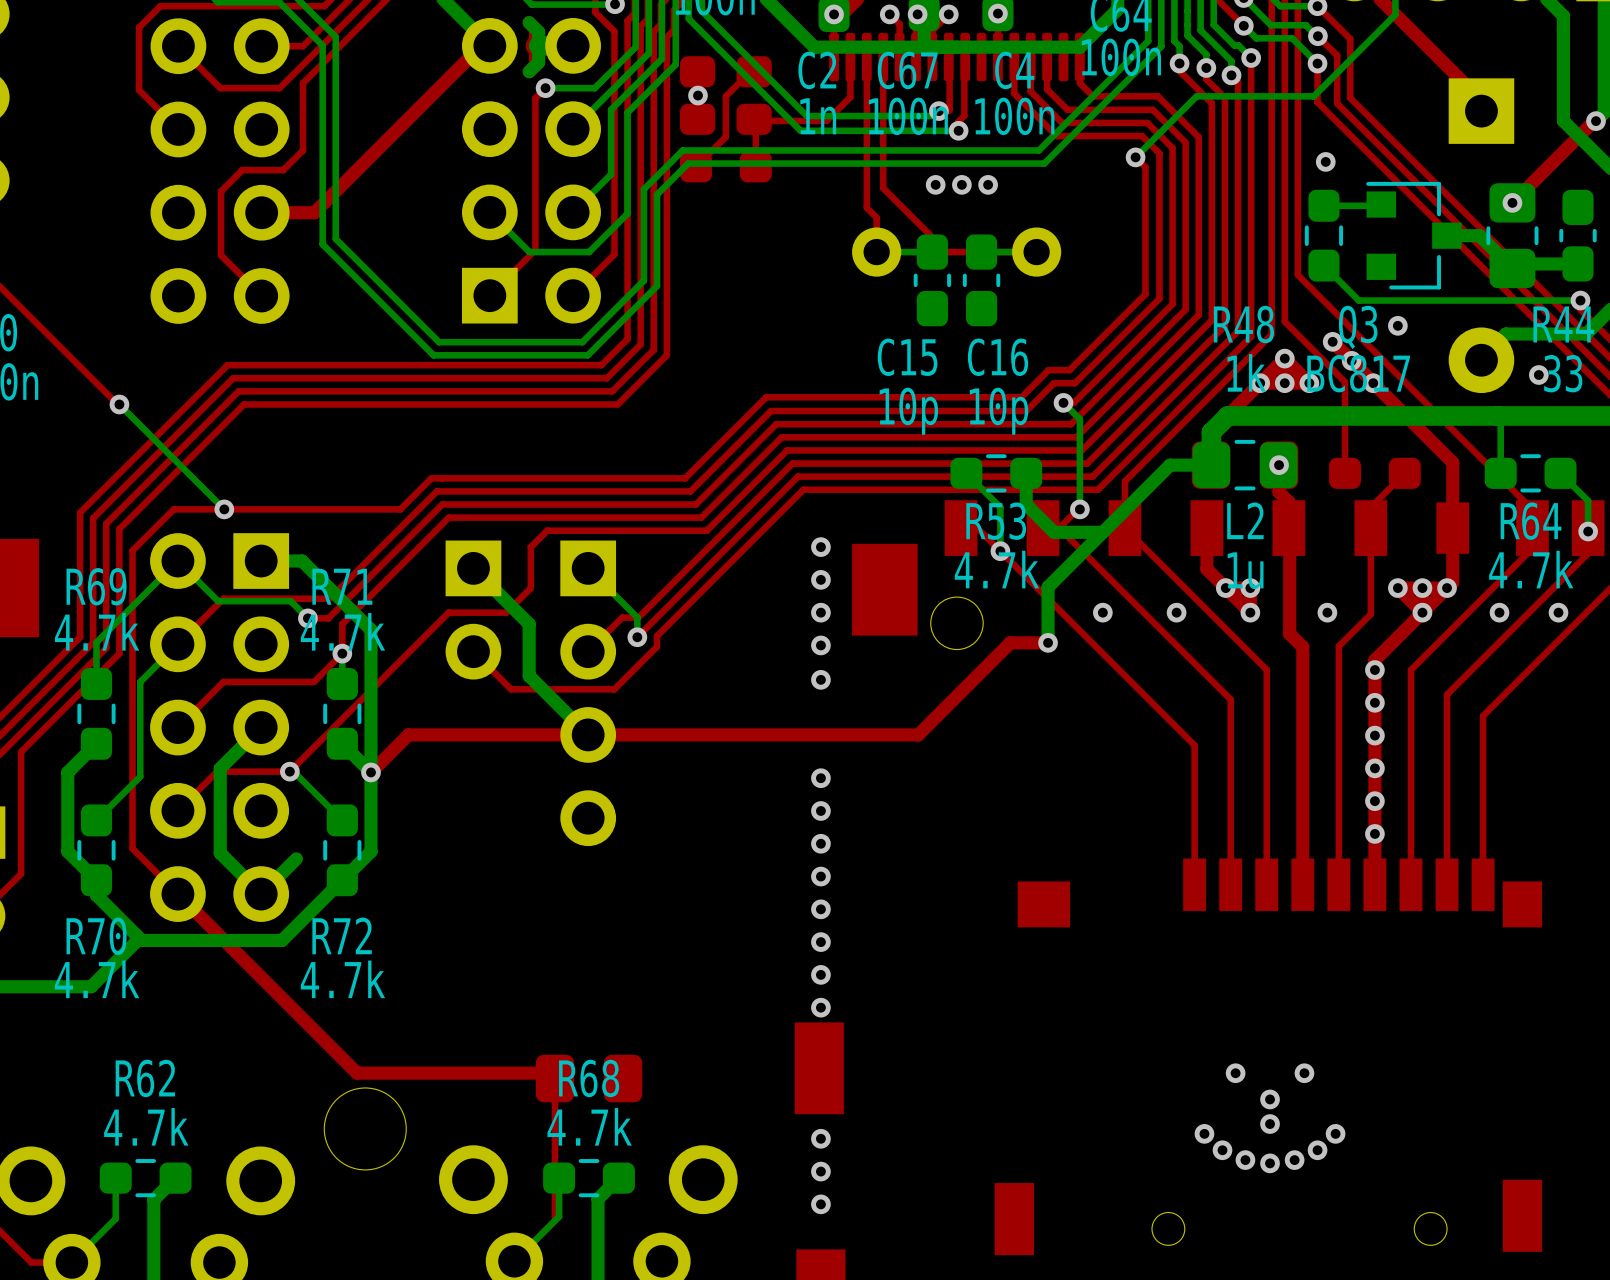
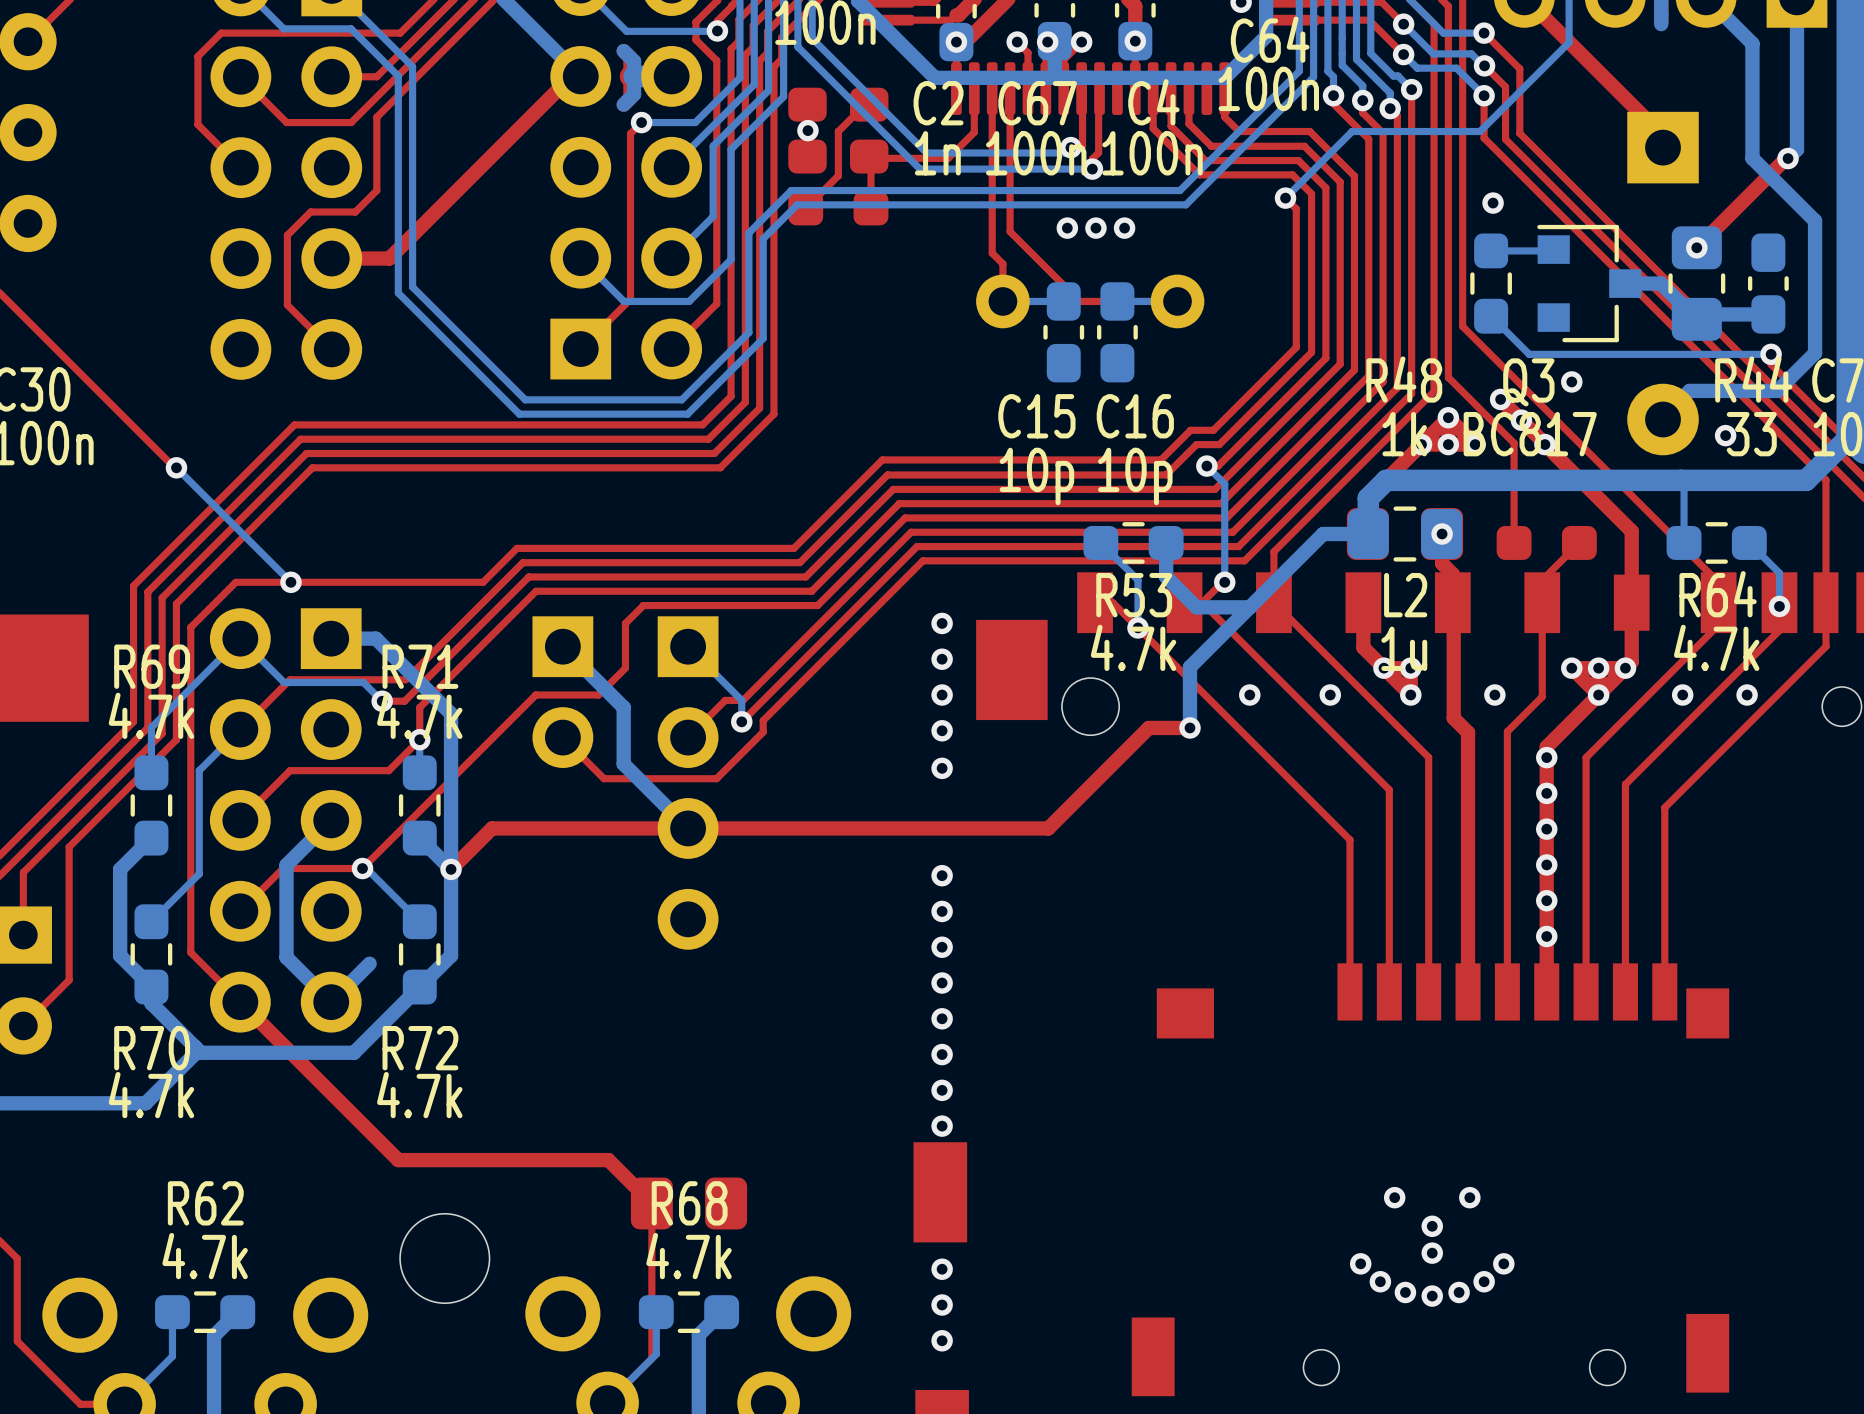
top track: (322, 1038) (356, 1073) (549, 1073) -> (398, 1160) (608, 1160) (645, 1197)

